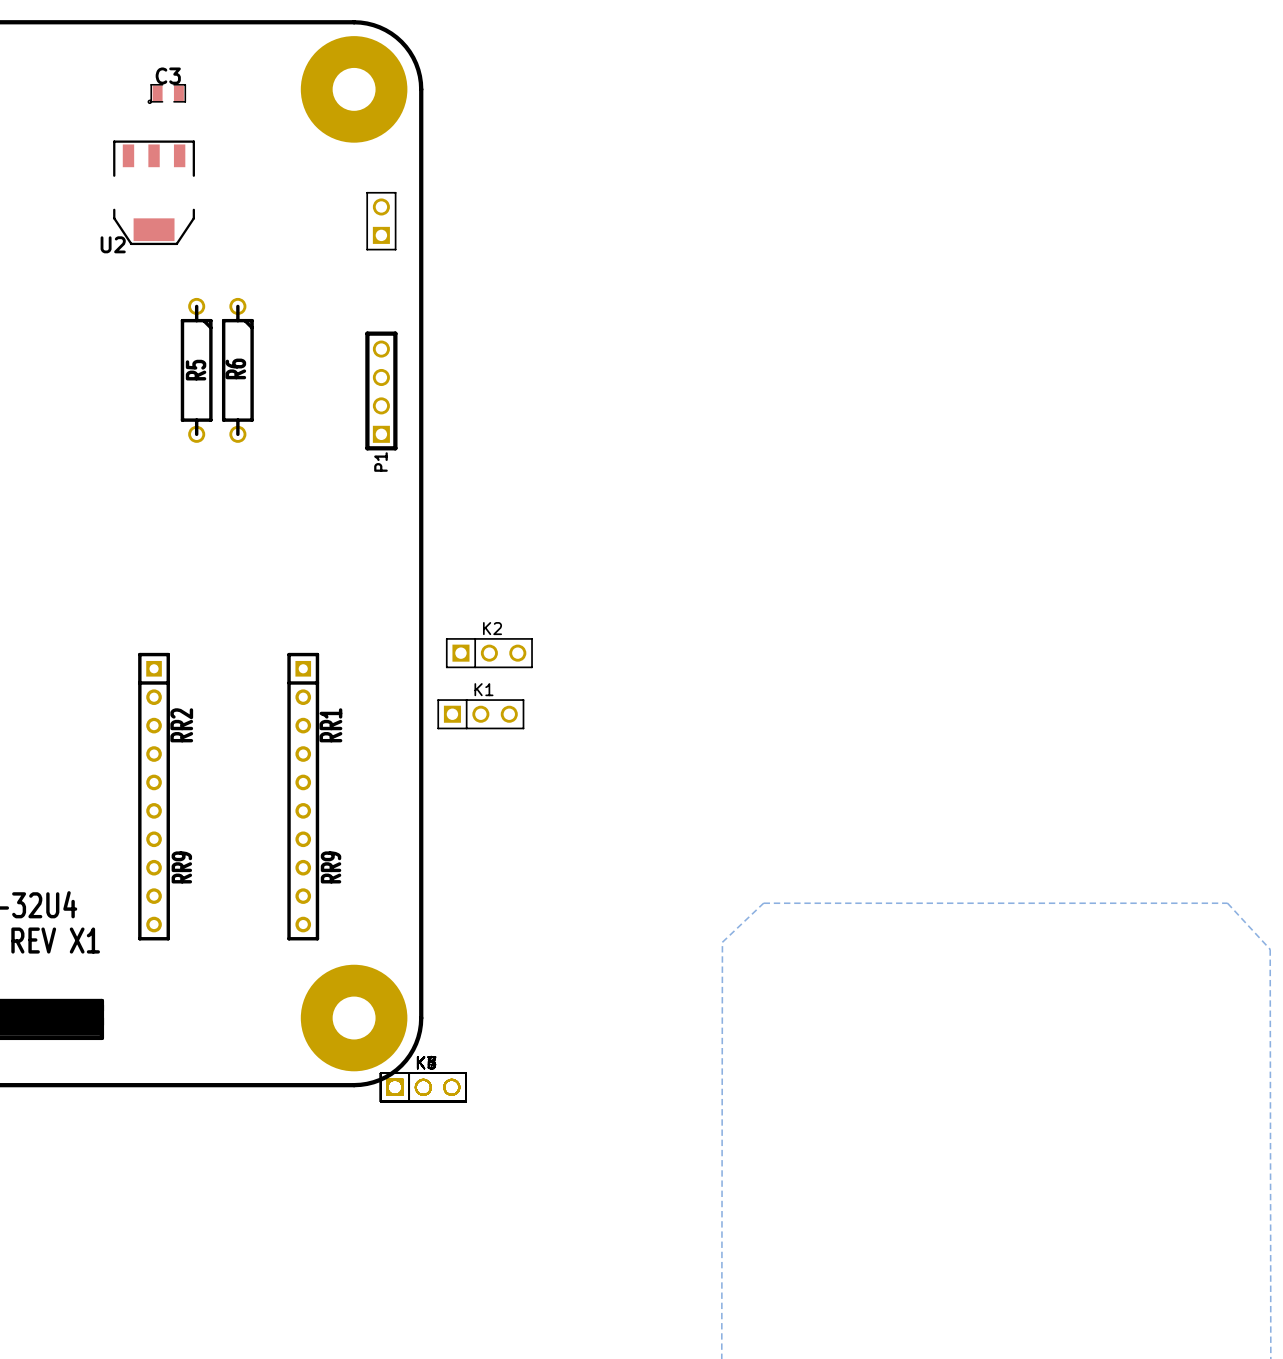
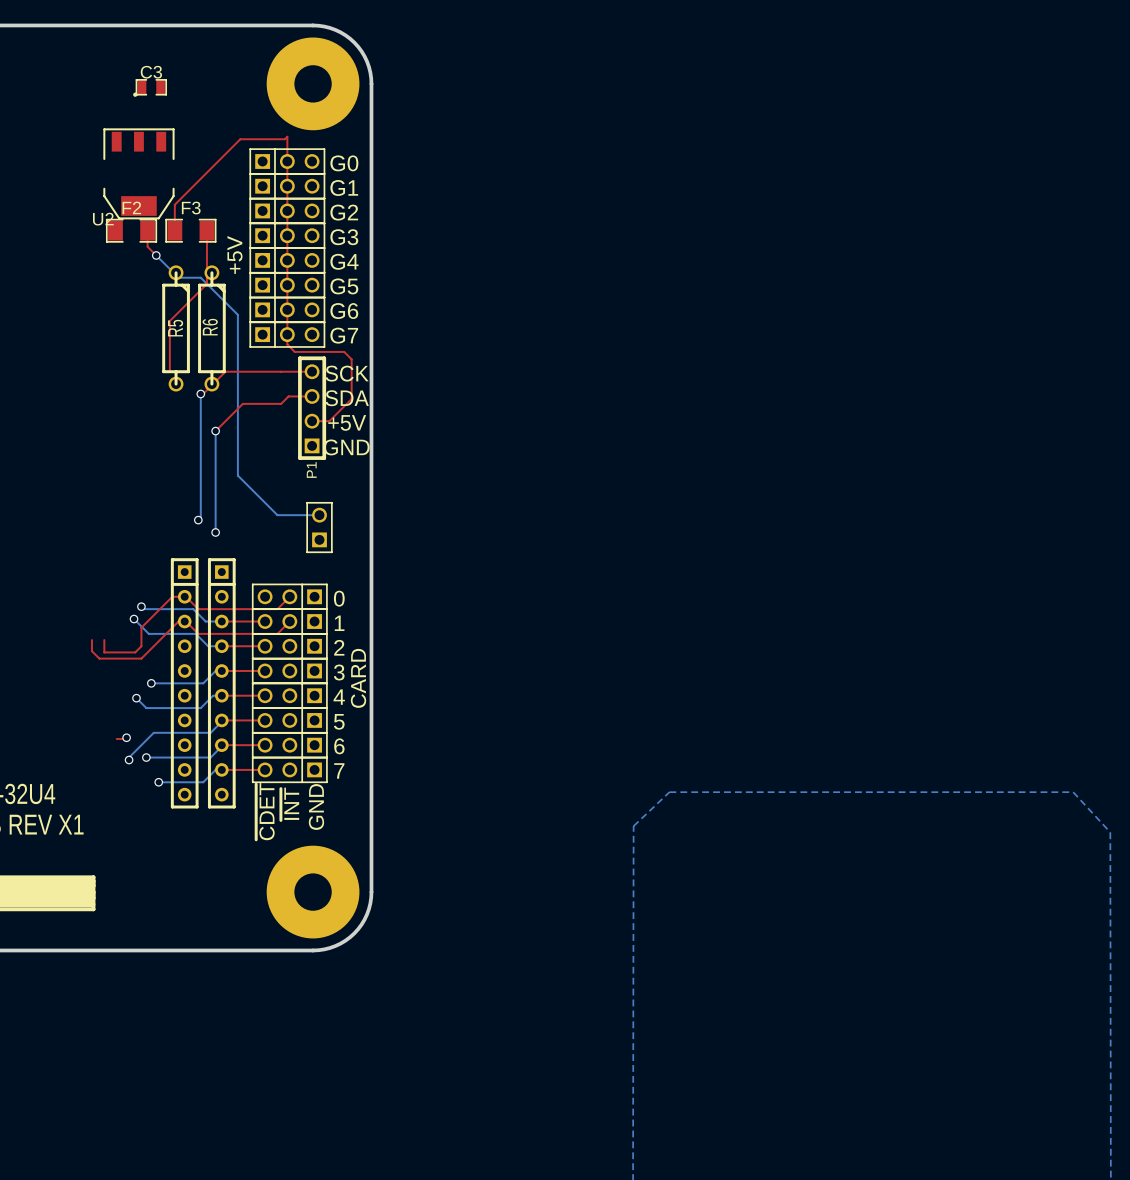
part: none -> (287, 161)
text: none -> G0 (344, 163)
part: none -> (287, 186)
text: none -> G1 (344, 187)
part: (381, 221) -> none
part: none -> (287, 210)
text: none -> G2 (344, 212)
F2: none -> (131, 230)
top track: none -> (147, 230) (147, 246) (156, 255)
top track: none -> (174, 230) (174, 204) (240, 139) (284, 139) (287, 136) (287, 344) (294, 351) (344, 351) (351, 359) (351, 398) (329, 421) (312, 421)
F3: none -> (190, 230)
top track: none -> (206, 230) (206, 283) (169, 321) (169, 371)
part: none -> (287, 235)
text: none -> G3 (344, 237)
text: none -> +5V (234, 254)
bottom track: none -> (156, 255) (178, 277) (200, 277) (237, 314) (237, 475) (277, 515) (319, 515)
via: none -> (156, 255)
part: none -> (287, 260)
text: none -> G4 (344, 261)
part: none -> (287, 285)
text: none -> G5 (344, 286)
part: none -> (287, 309)
text: none -> G6 (344, 311)
part: none -> (287, 334)
text: none -> G7 (344, 335)
P1 position: (381, 390) -> (312, 408)
top track: none -> (312, 371) (225, 371) (203, 393) (200, 393)
text: none -> SCK (347, 373)
bottom track: none -> (200, 393) (200, 517) (198, 520)
via: none -> (200, 393)
top track: none -> (312, 396) (288, 396) (281, 403) (242, 403) (215, 431)
text: none -> SDA (347, 398)
text: none -> +5V (347, 422)
bottom track: none -> (215, 431) (215, 532)
via: none -> (215, 431)
text: none -> GND (346, 447)
via: none -> (198, 520)
part: none -> (319, 527)
via: none -> (215, 532)
K2: (489, 653) -> none
top track: none -> (289, 596) (277, 609) (198, 609) (185, 596) (172, 596) (141, 627) (141, 646) (135, 652) (104, 652) (104, 640)
part: none -> (289, 596)
text: none -> 0 (339, 598)
bottom track: none -> (141, 606) (143, 609) (193, 609) (205, 621) (221, 621)
via: none -> (141, 606)
bottom track: none -> (134, 619) (148, 633) (195, 633) (208, 646) (221, 646) (221, 649)
via: none -> (134, 619)
top track: none -> (221, 621) (265, 621)
top track: none -> (289, 621) (277, 633) (198, 633) (185, 621) (178, 621) (141, 658) (99, 658) (91, 651) (91, 640)
part: none -> (289, 621)
text: none -> 1 (339, 623)
K1: (480, 714) -> none
top track: none -> (221, 646) (265, 646)
part: none -> (289, 646)
text: none -> 2 (339, 647)
top track: none -> (221, 670) (265, 670)
part: none -> (289, 670)
text: none -> 3 (339, 672)
bottom track: none -> (221, 674) (221, 670) (215, 670) (203, 683) (151, 683)
text: none -> CARD (358, 678)
via: none -> (151, 683)
part: none -> (184, 683)
part: none -> (221, 683)
top track: none -> (221, 695) (265, 695)
bottom track: none -> (221, 695) (213, 695) (200, 708) (146, 708) (136, 698)
part: none -> (289, 695)
text: none -> 4 (339, 697)
via: none -> (136, 698)
RR2: RR9 (154, 796) -> none
RR1: RR9 (303, 796) -> none
top track: none -> (221, 720) (265, 720)
bottom track: none -> (221, 720) (210, 732) (153, 732) (129, 757) (129, 760)
part: none -> (289, 720)
text: none -> 5 (339, 721)
top track: none -> (126, 737) (116, 738)
via: none -> (126, 737)
bottom track: none -> (215, 745) (221, 746) (210, 757) (146, 757)
top track: none -> (221, 745) (265, 745)
part: none -> (289, 745)
text: none -> 6 (339, 746)
via: none -> (146, 757)
via: none -> (129, 760)
top track: none -> (221, 769) (265, 769)
bottom track: none -> (221, 769) (215, 769) (203, 782) (158, 782)
part: none -> (289, 769)
text: none -> 7 (339, 770)
via: none -> (158, 782)
text: none -> ~{INT} (290, 804)
text: none -> GND (316, 806)
text: none -> ~{CDET} (265, 811)
part: (423, 1087) -> none
part: (423, 1087) -> none
part: (423, 1087) -> none
part: (423, 1087) -> none
part: (423, 1087) -> none
part: (423, 1087) -> none

